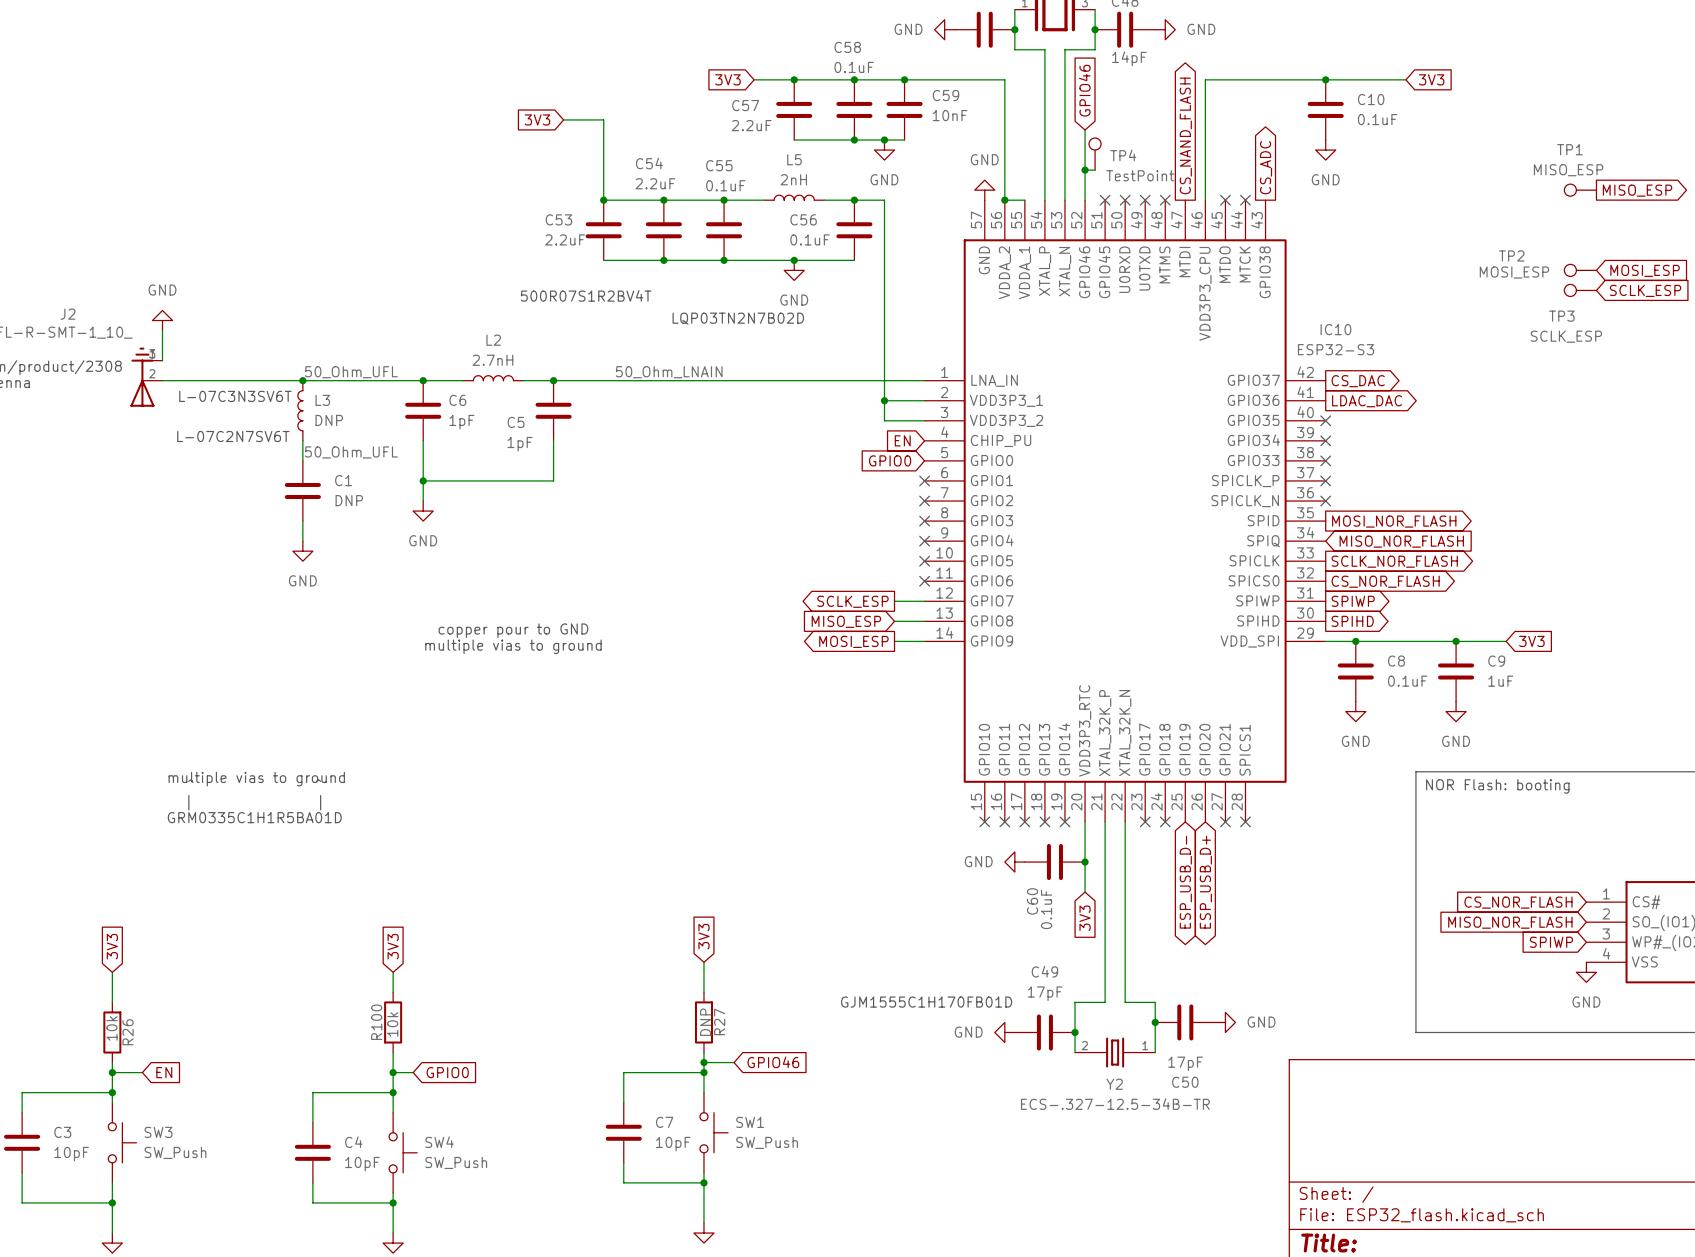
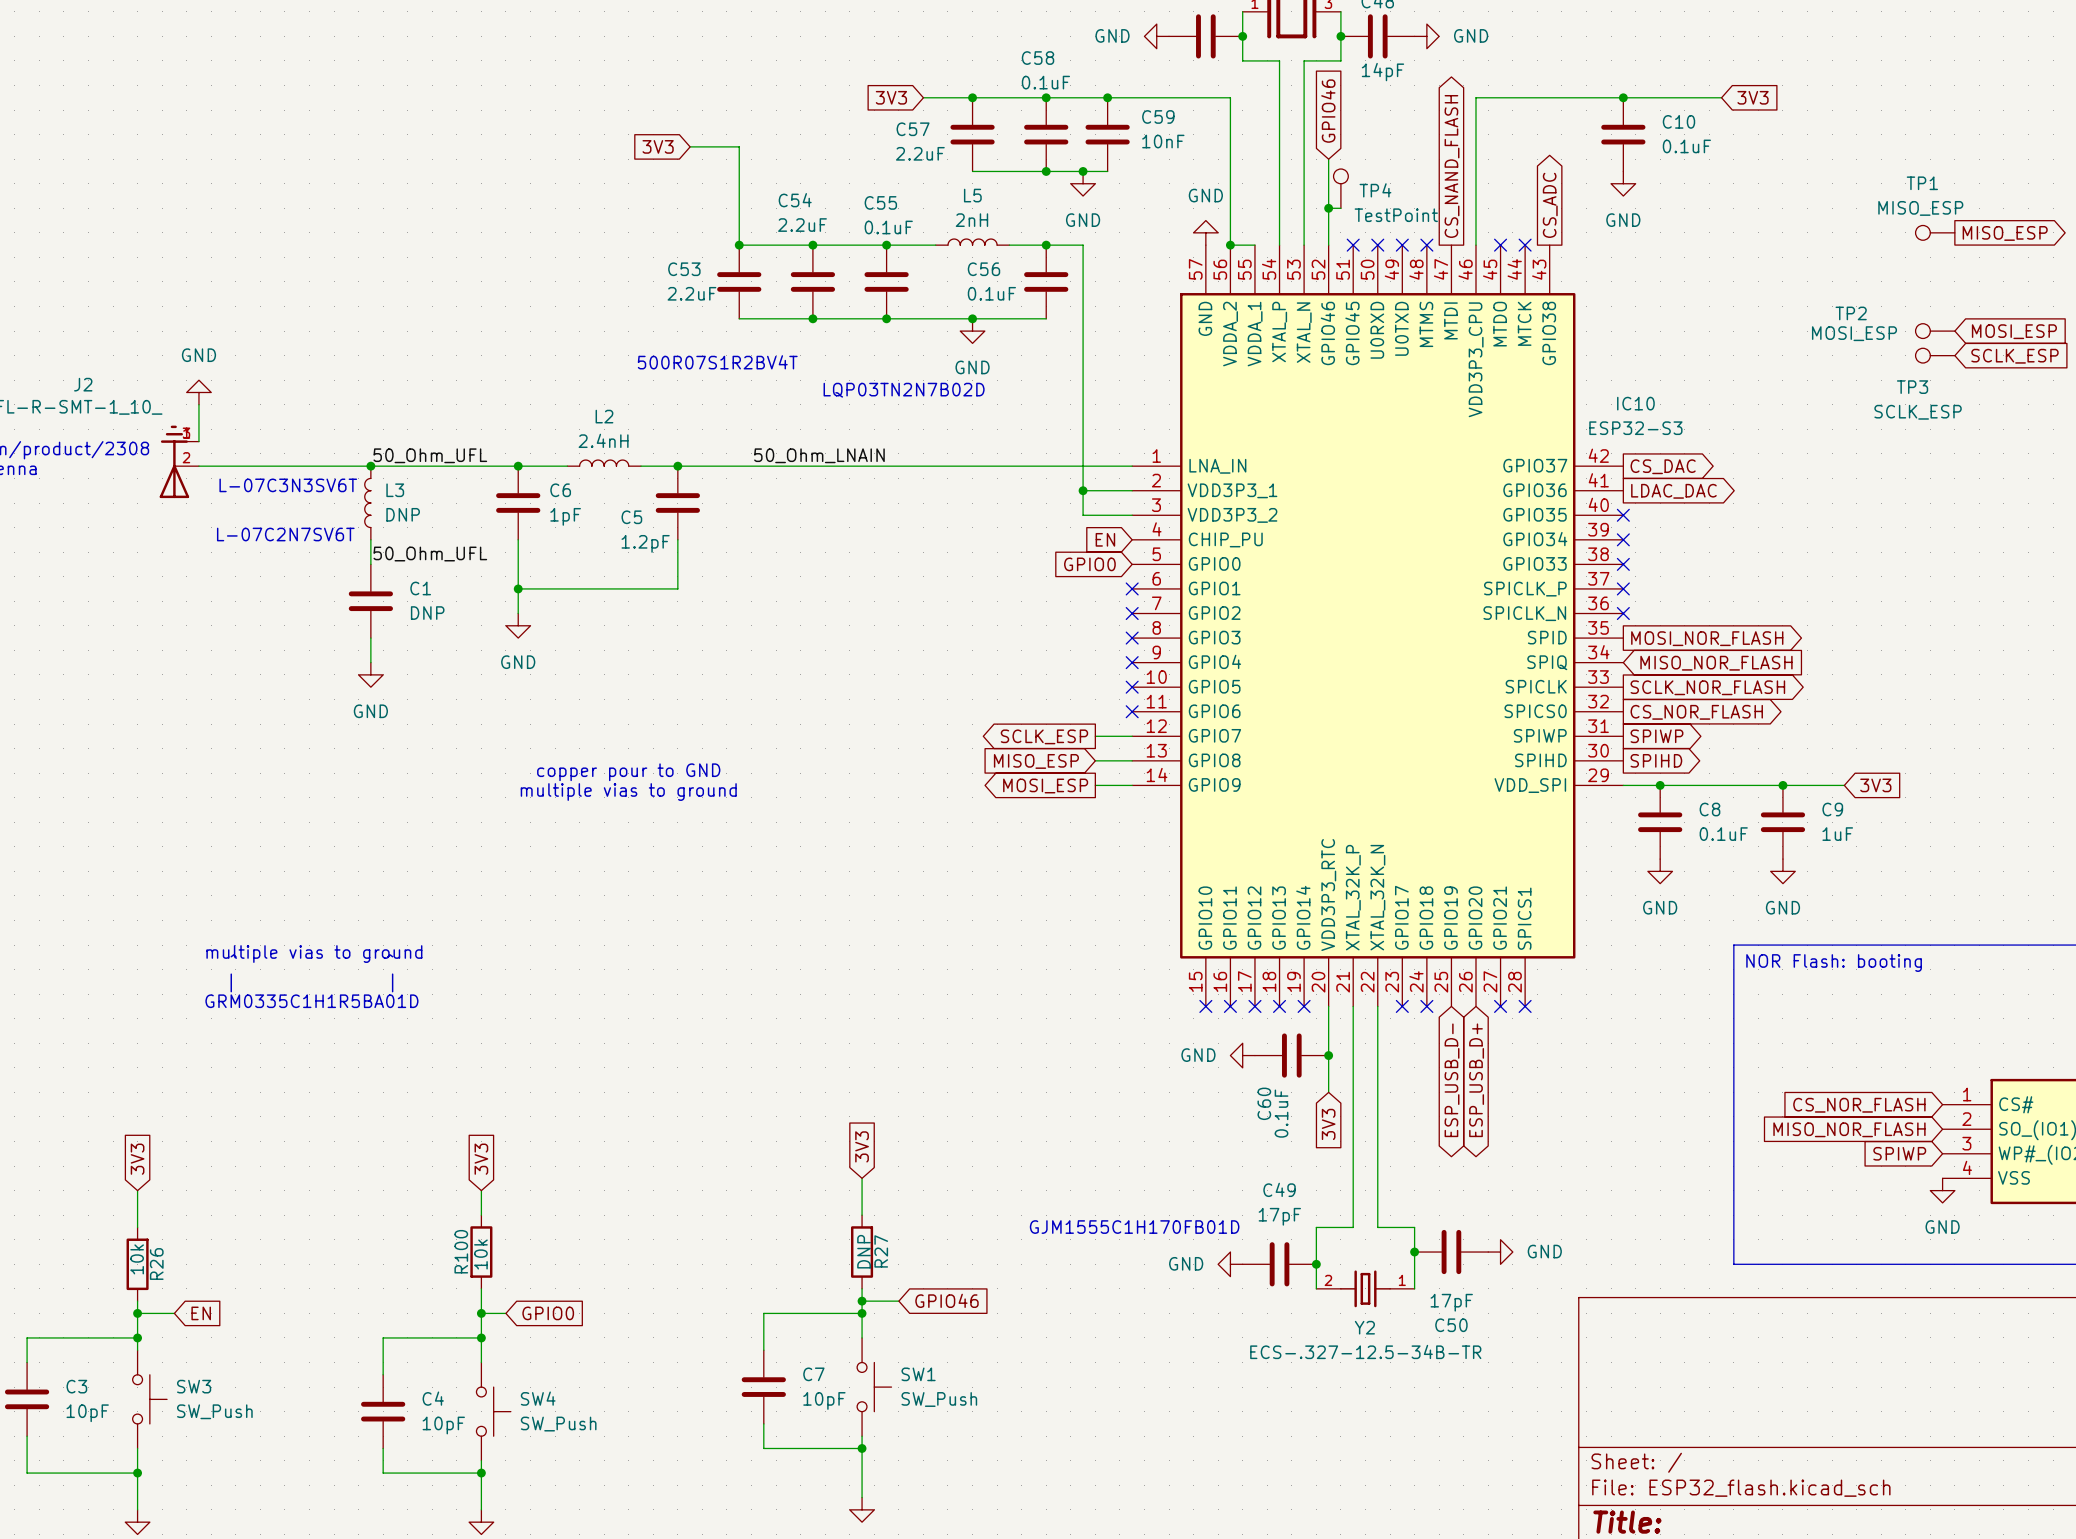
L2 value: 2.7nH (492, 360) -> 2.4nH (603, 440)
C5 value: 1pF (520, 444) -> 1.2pF (645, 543)

